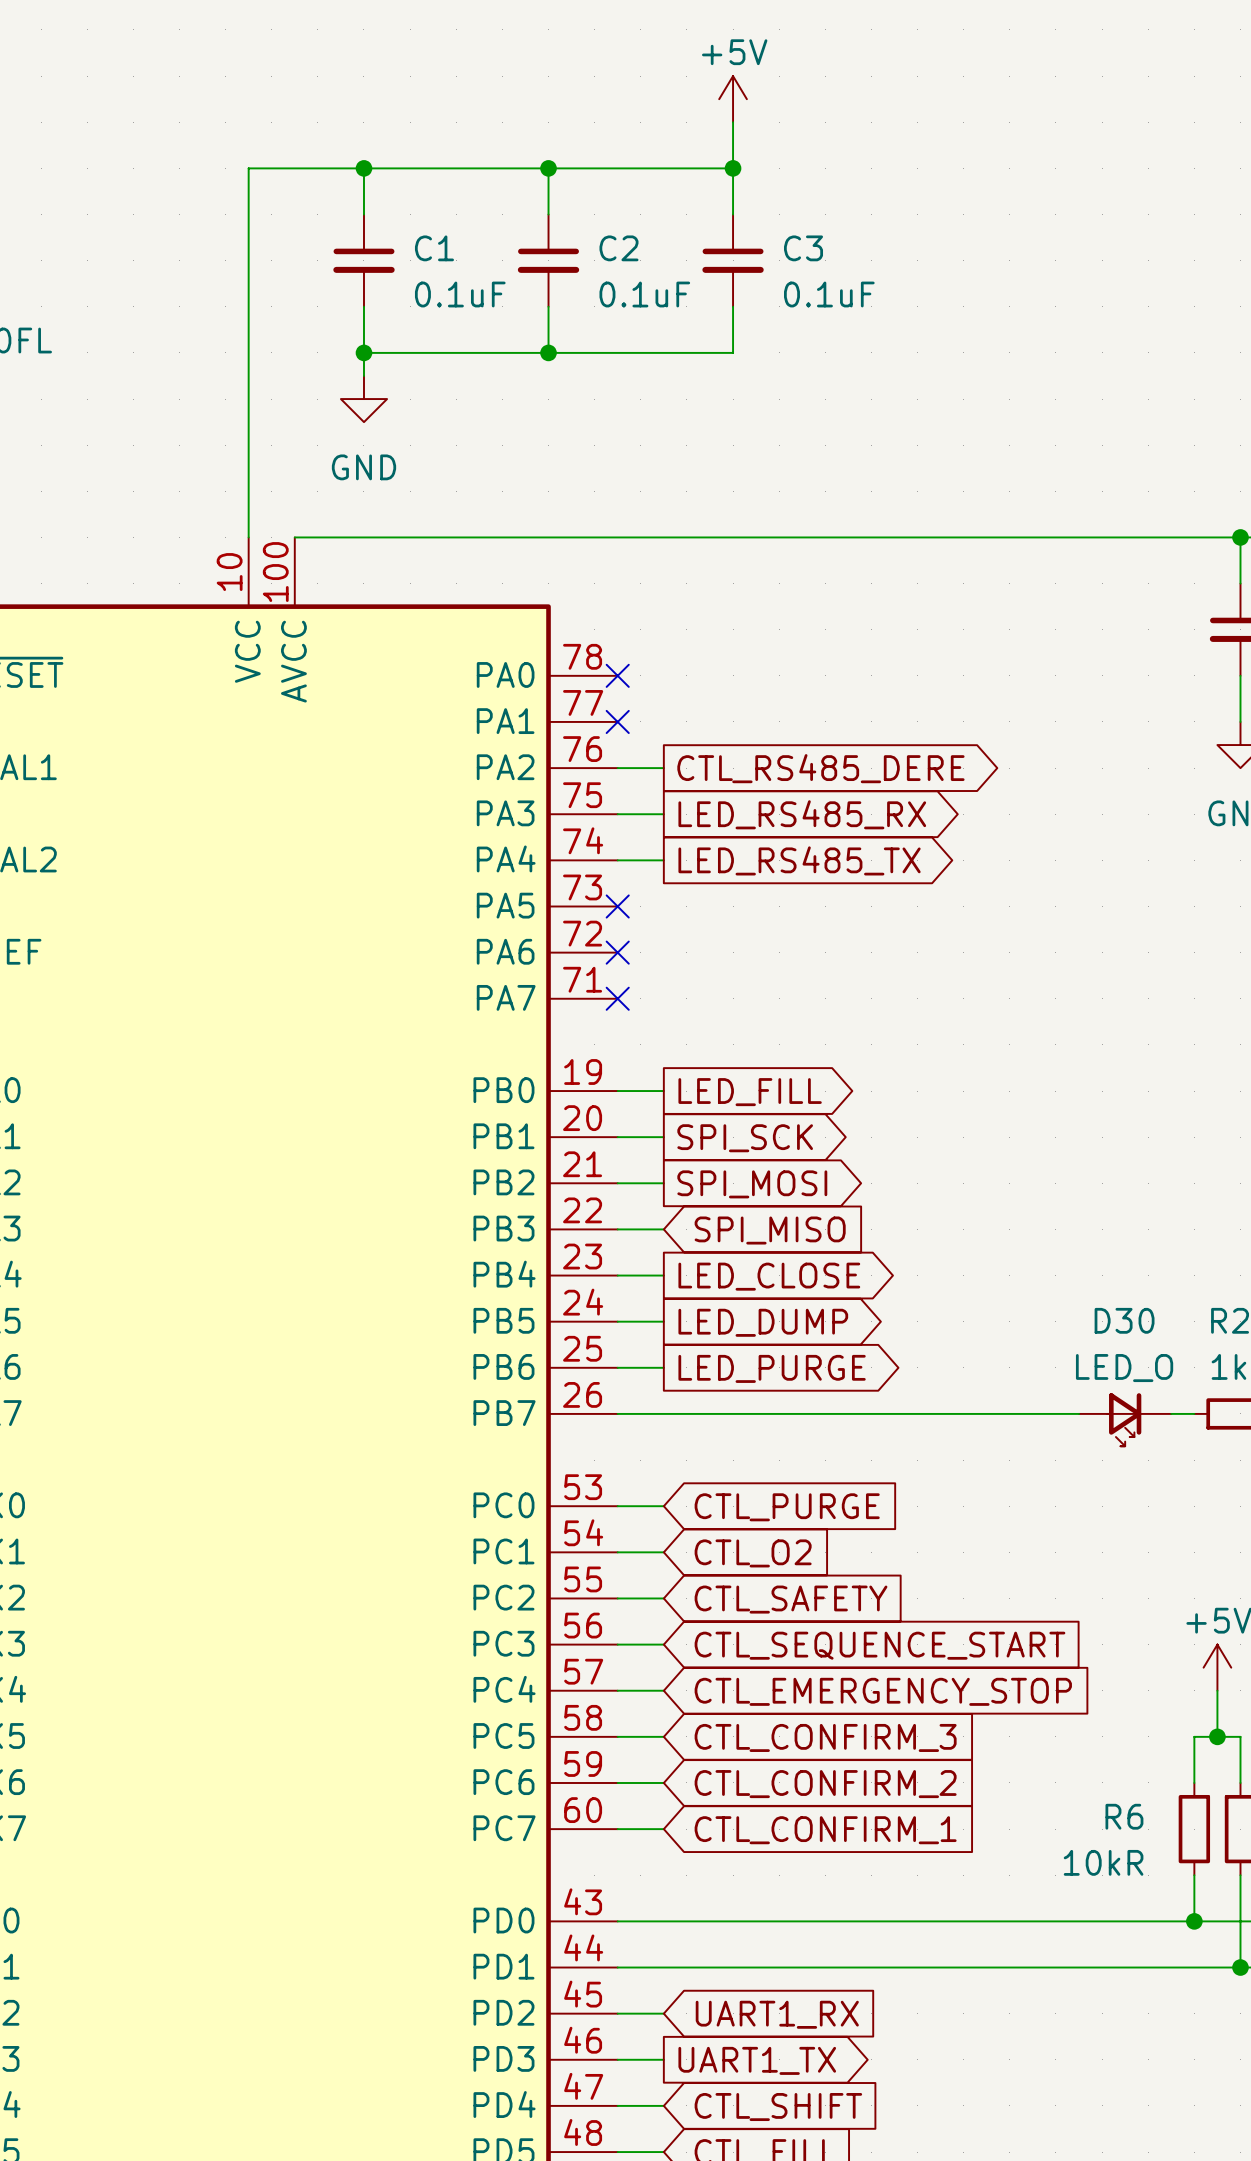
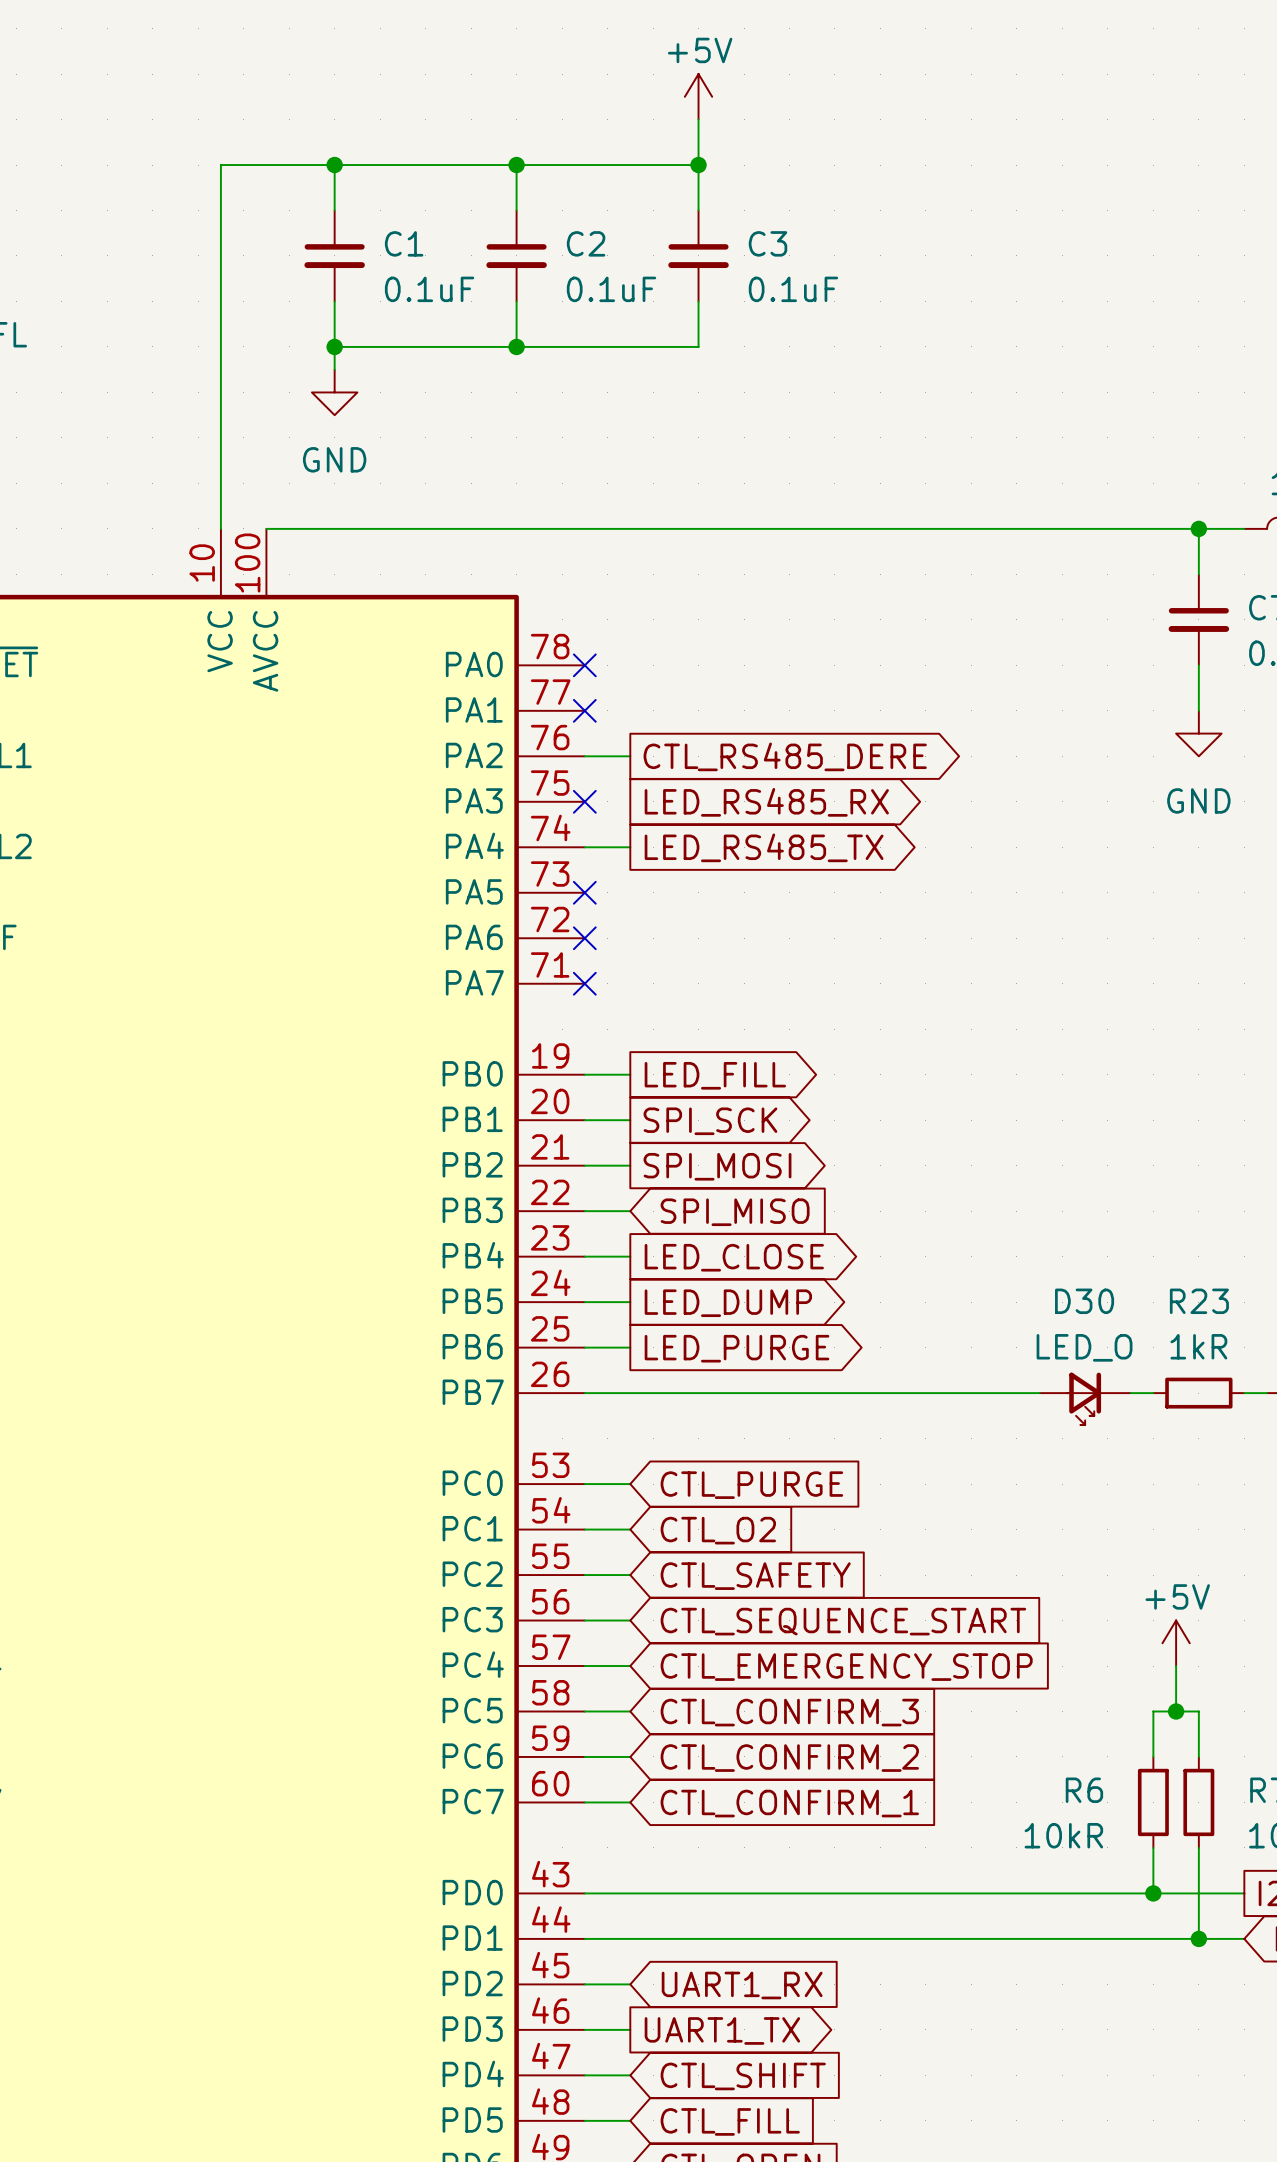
wire: (617, 814) (663, 814) -> none
no-connect mark: none -> (584, 801)

